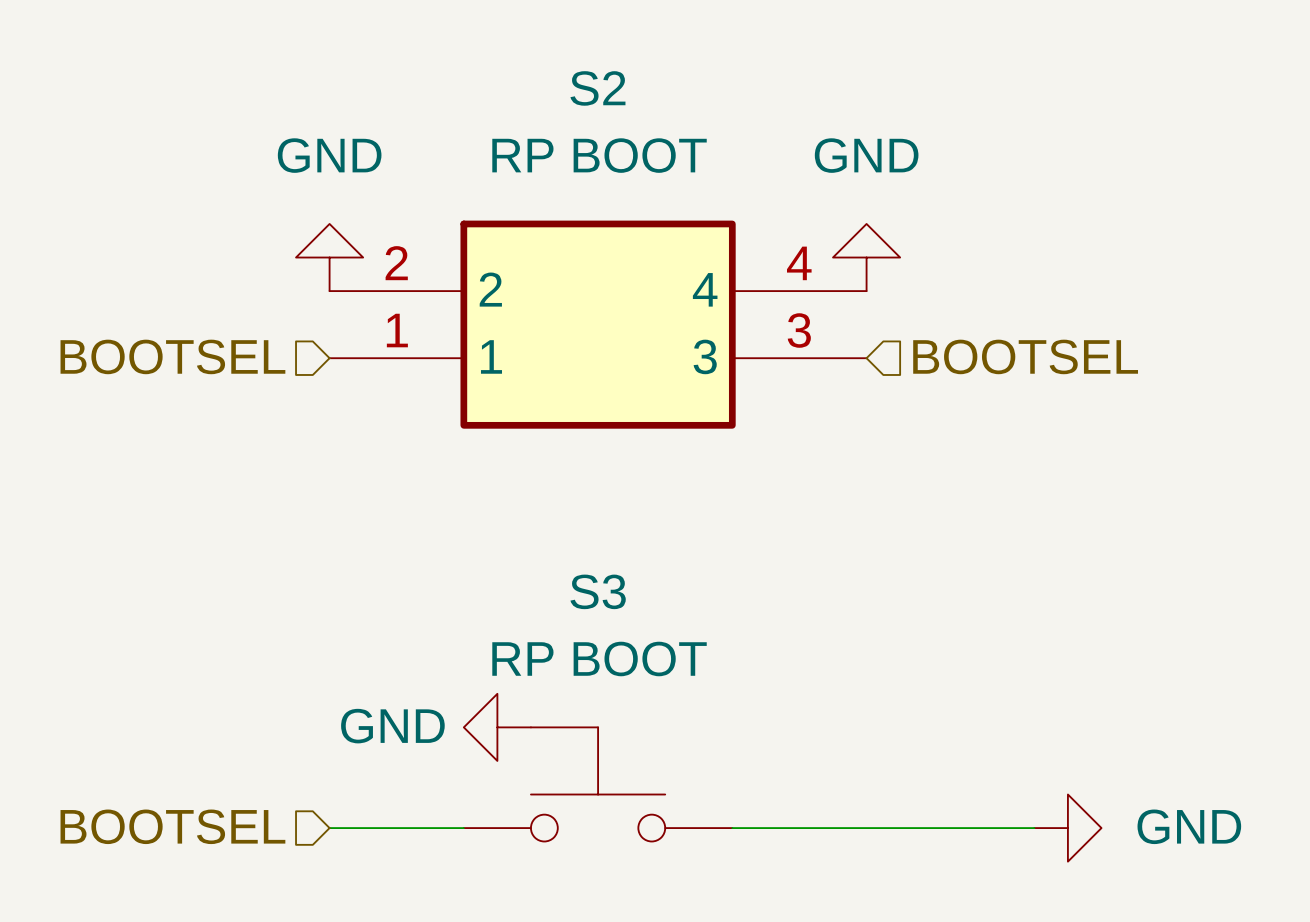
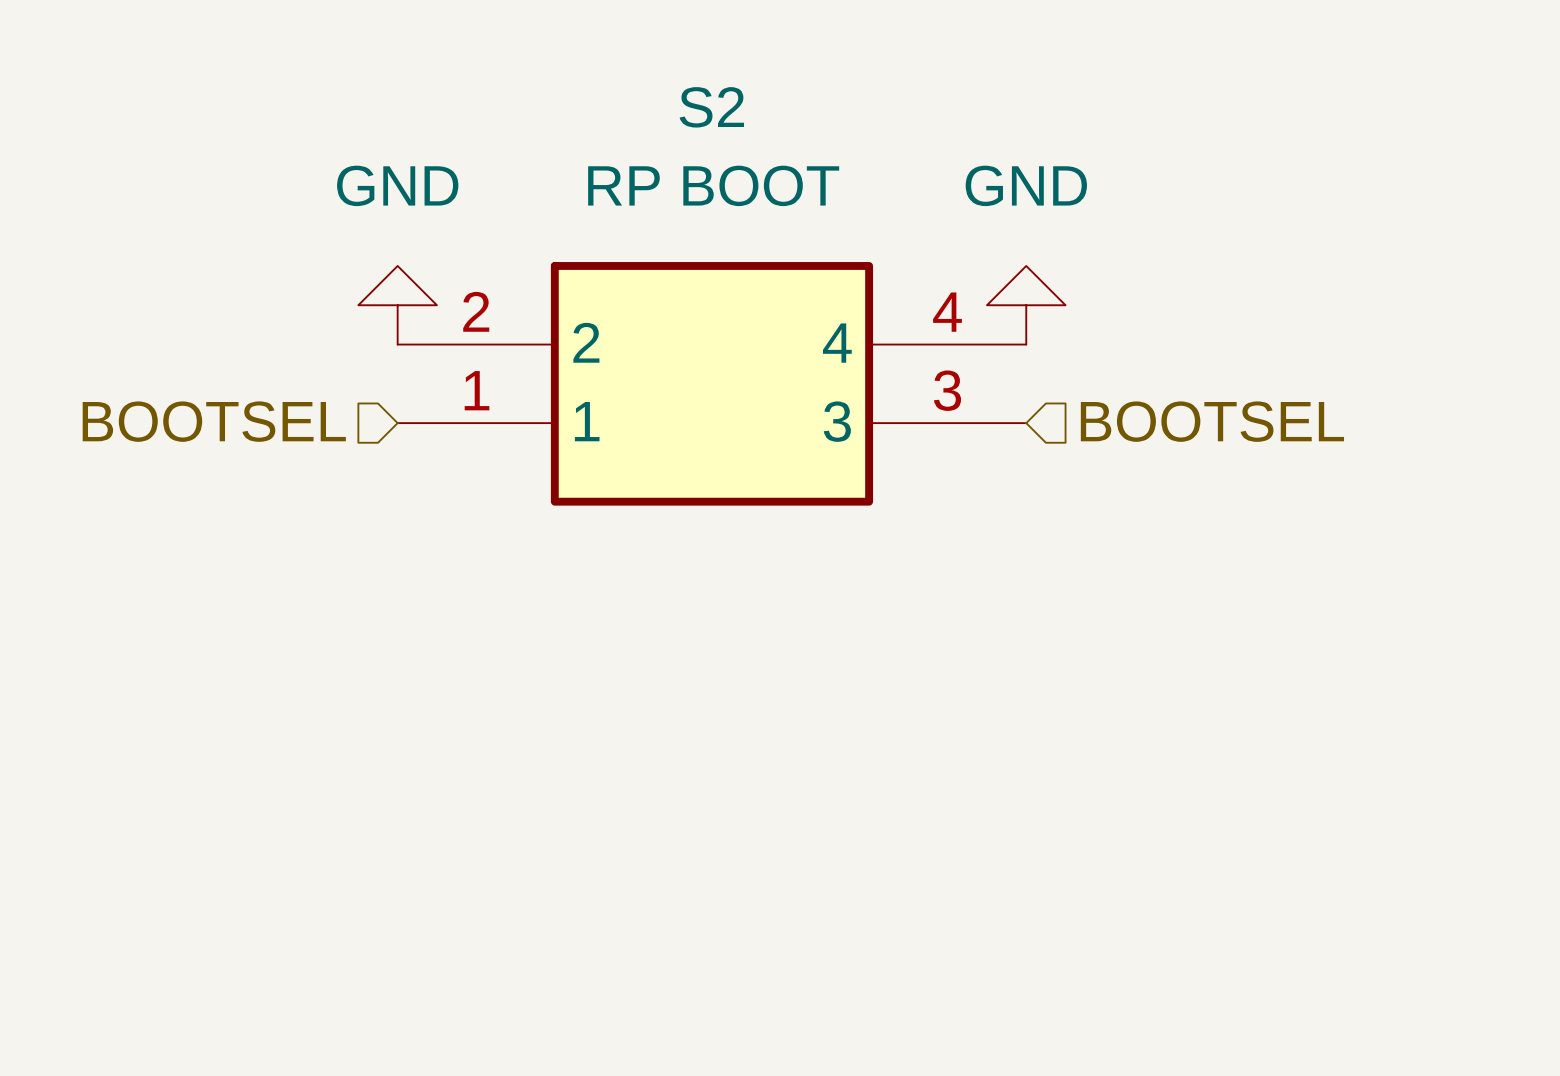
power symbol: GND (497, 727) -> none
S3: RP BOOT (598, 784) -> none
hierarchical label: BOOTSEL (172, 826) -> none
wire: (329, 828) (463, 828) -> none
wire: (732, 828) (1034, 828) -> none
power symbol: GND (1067, 828) -> none

